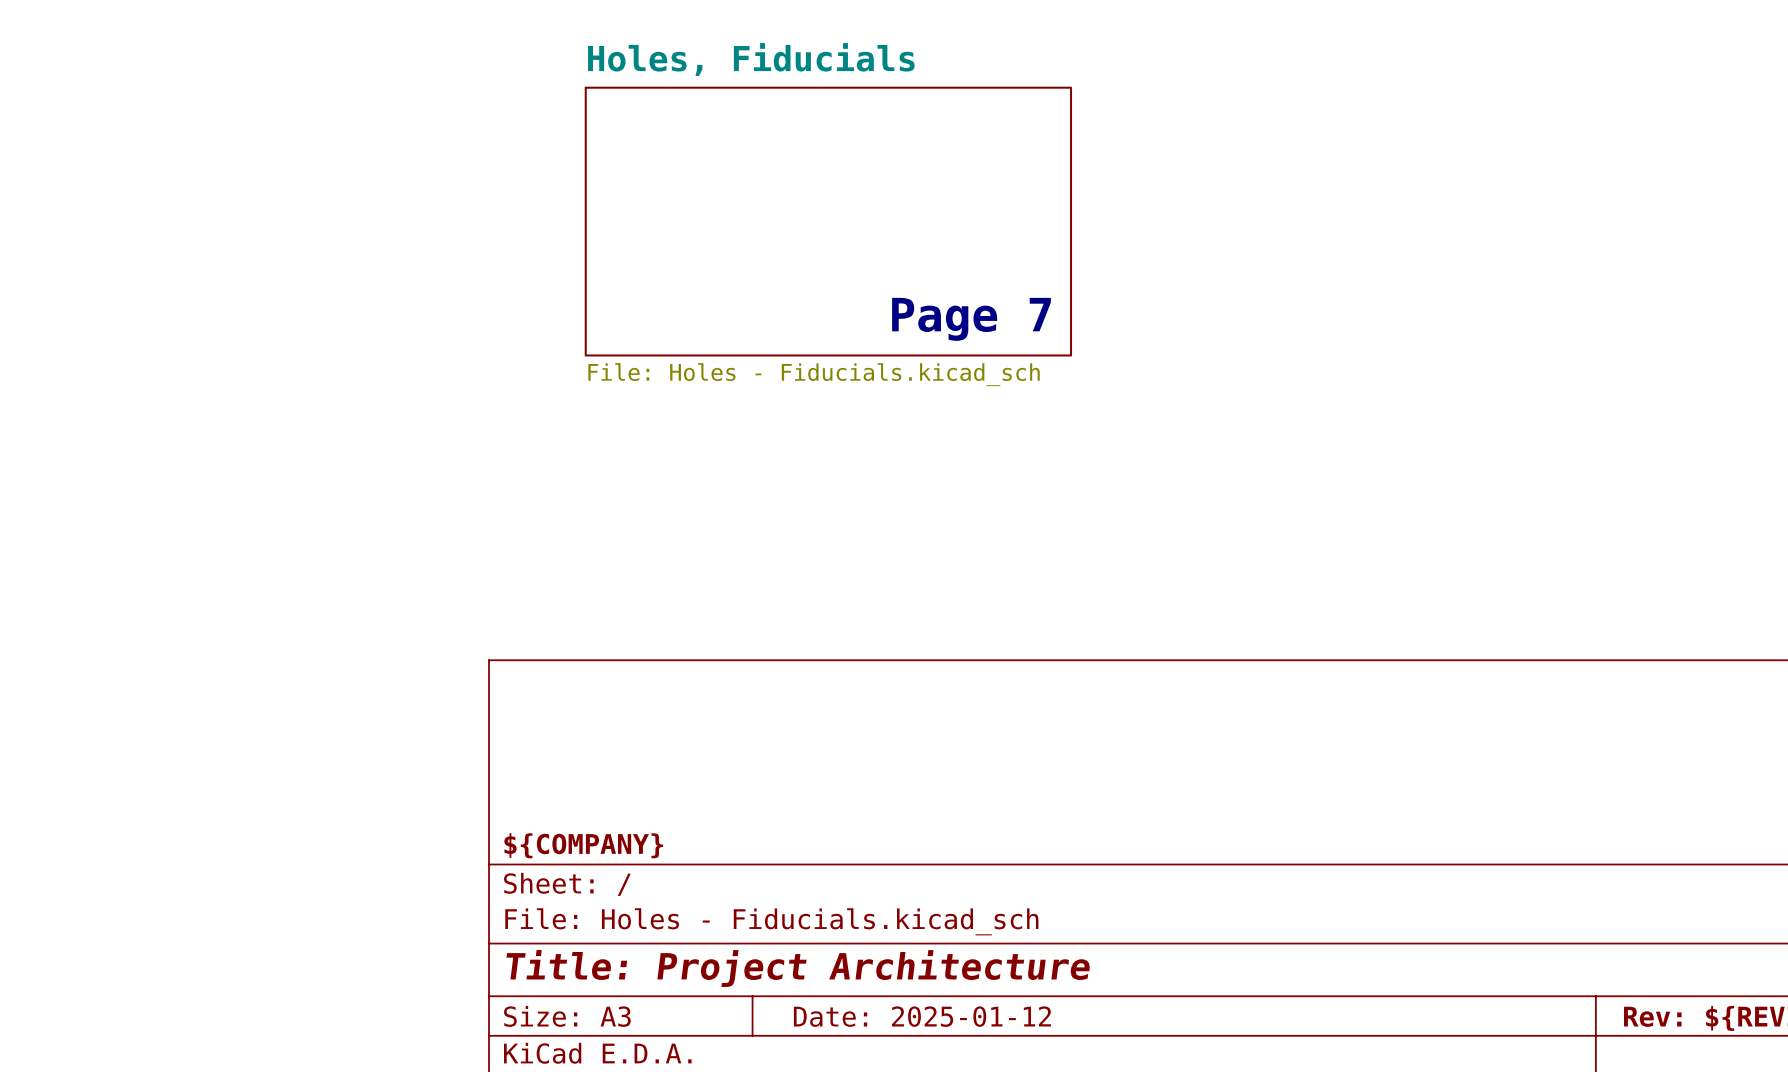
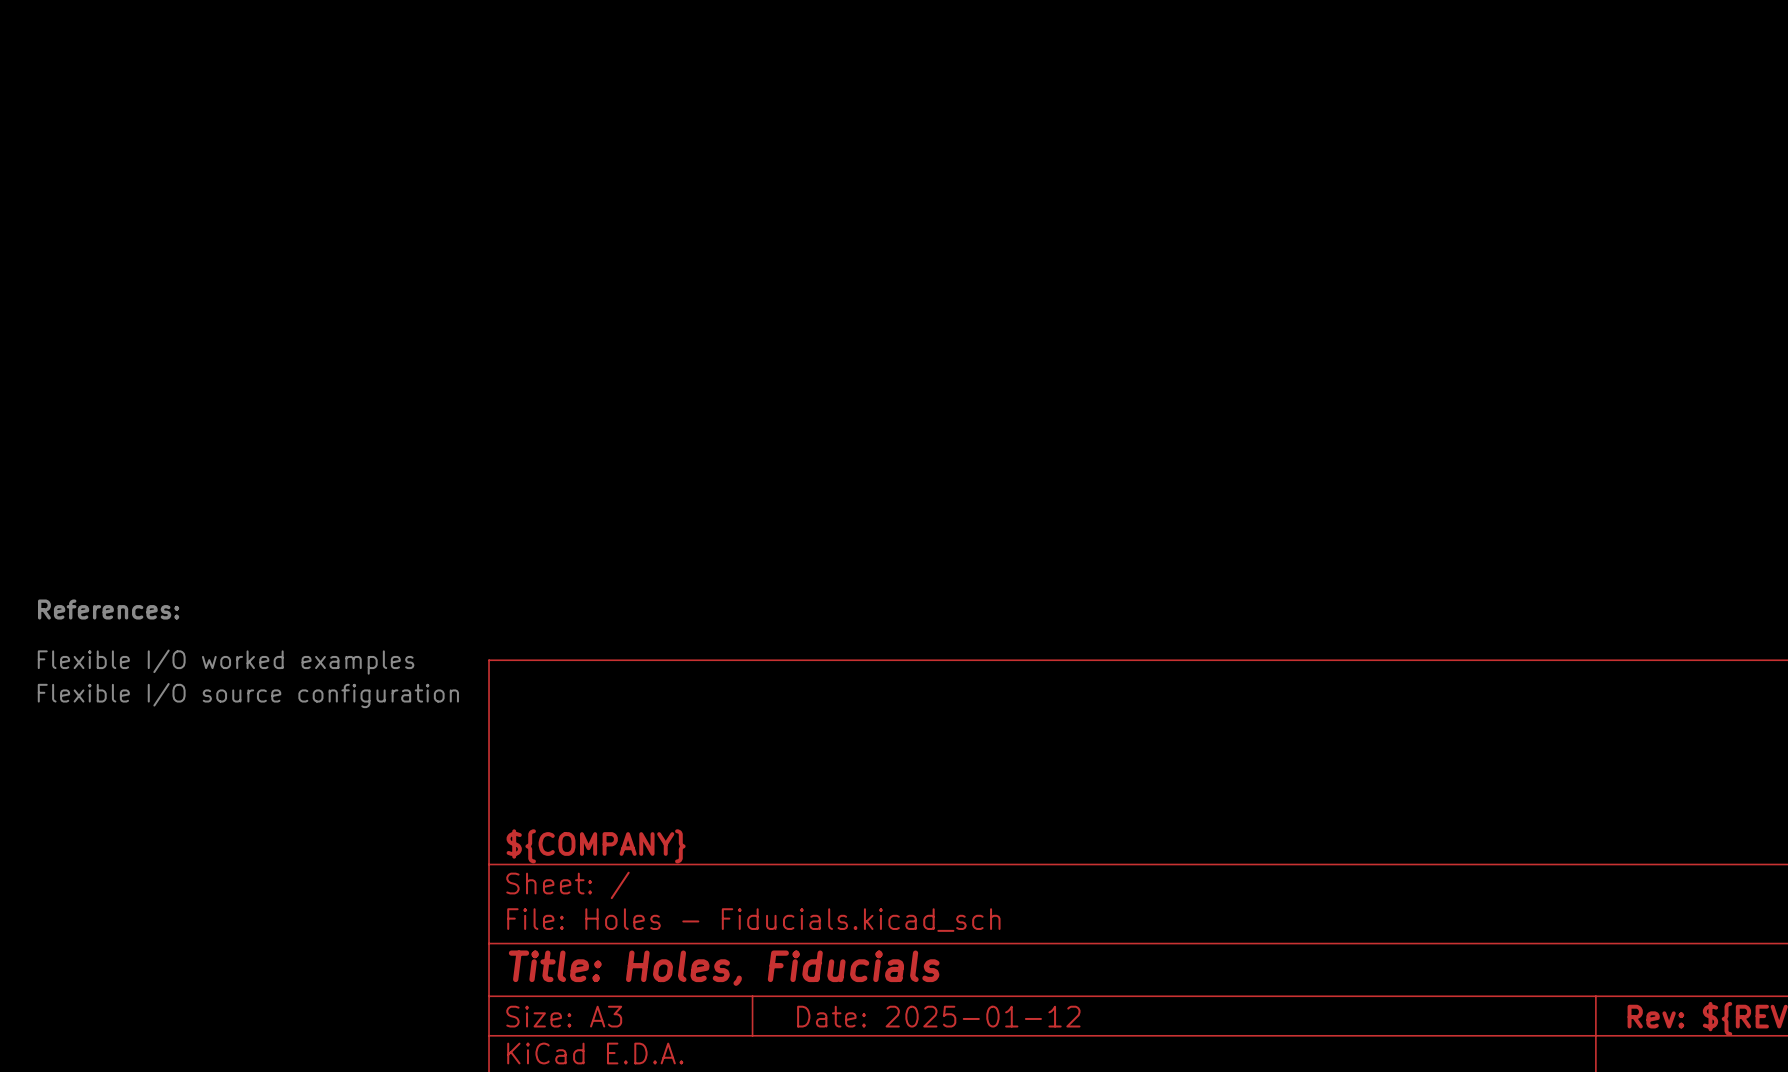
sheet Holes, Fiducials: File: Holes - Fiducials.kicad_sch (828, 221) -> none
text: Page 7 (971, 319) -> none
text: none -> References: (108, 609)
text: none -> Flexible I/O worked examples (226, 662)
text: none -> Flexible I/O source configuration (248, 695)
title block: Title: Project Architecture (798, 968) -> Title: Holes, Fiducials (724, 968)

